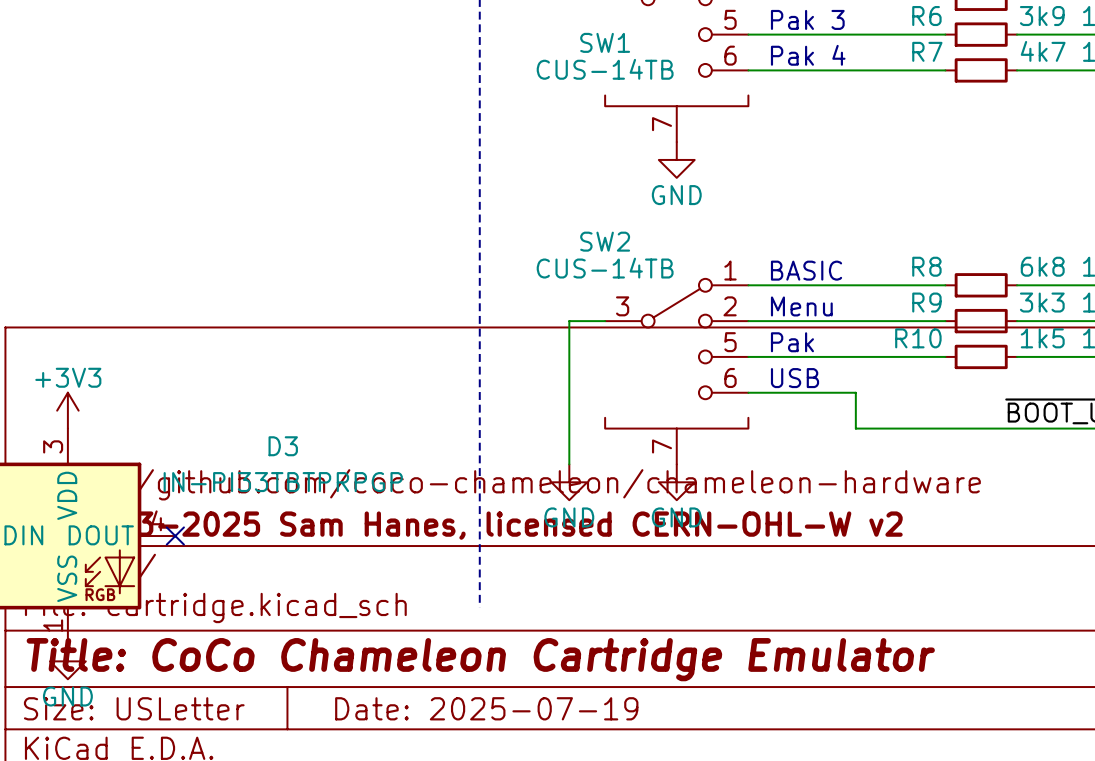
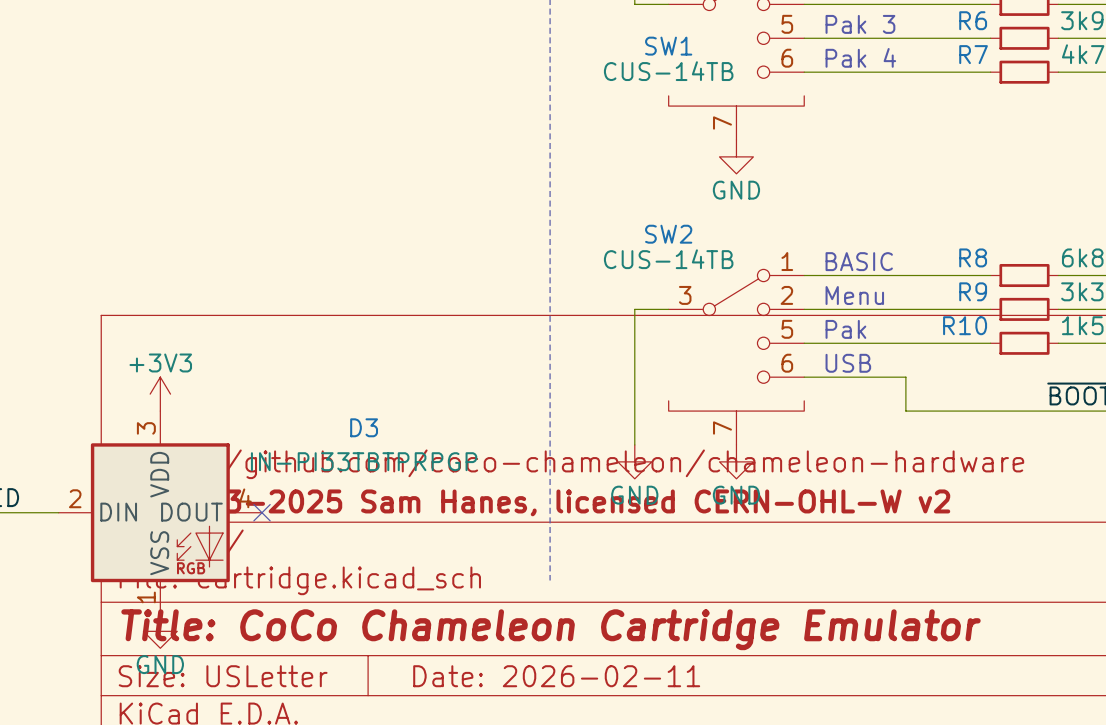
title block: Date: 2025-07-19 (486, 708) -> Date: 2026-02-11 (556, 676)

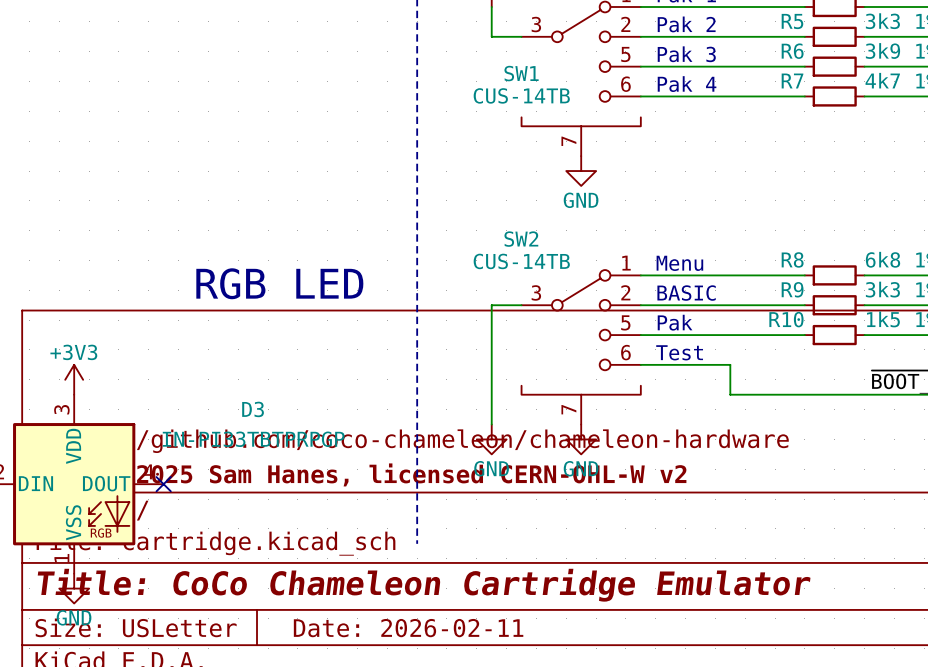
text: BASIC (859, 261) -> Menu (679, 263)
text: none -> RGB LED (279, 283)
text: Menu (854, 295) -> BASIC (686, 293)
text: USB (848, 363) -> Test (679, 352)

